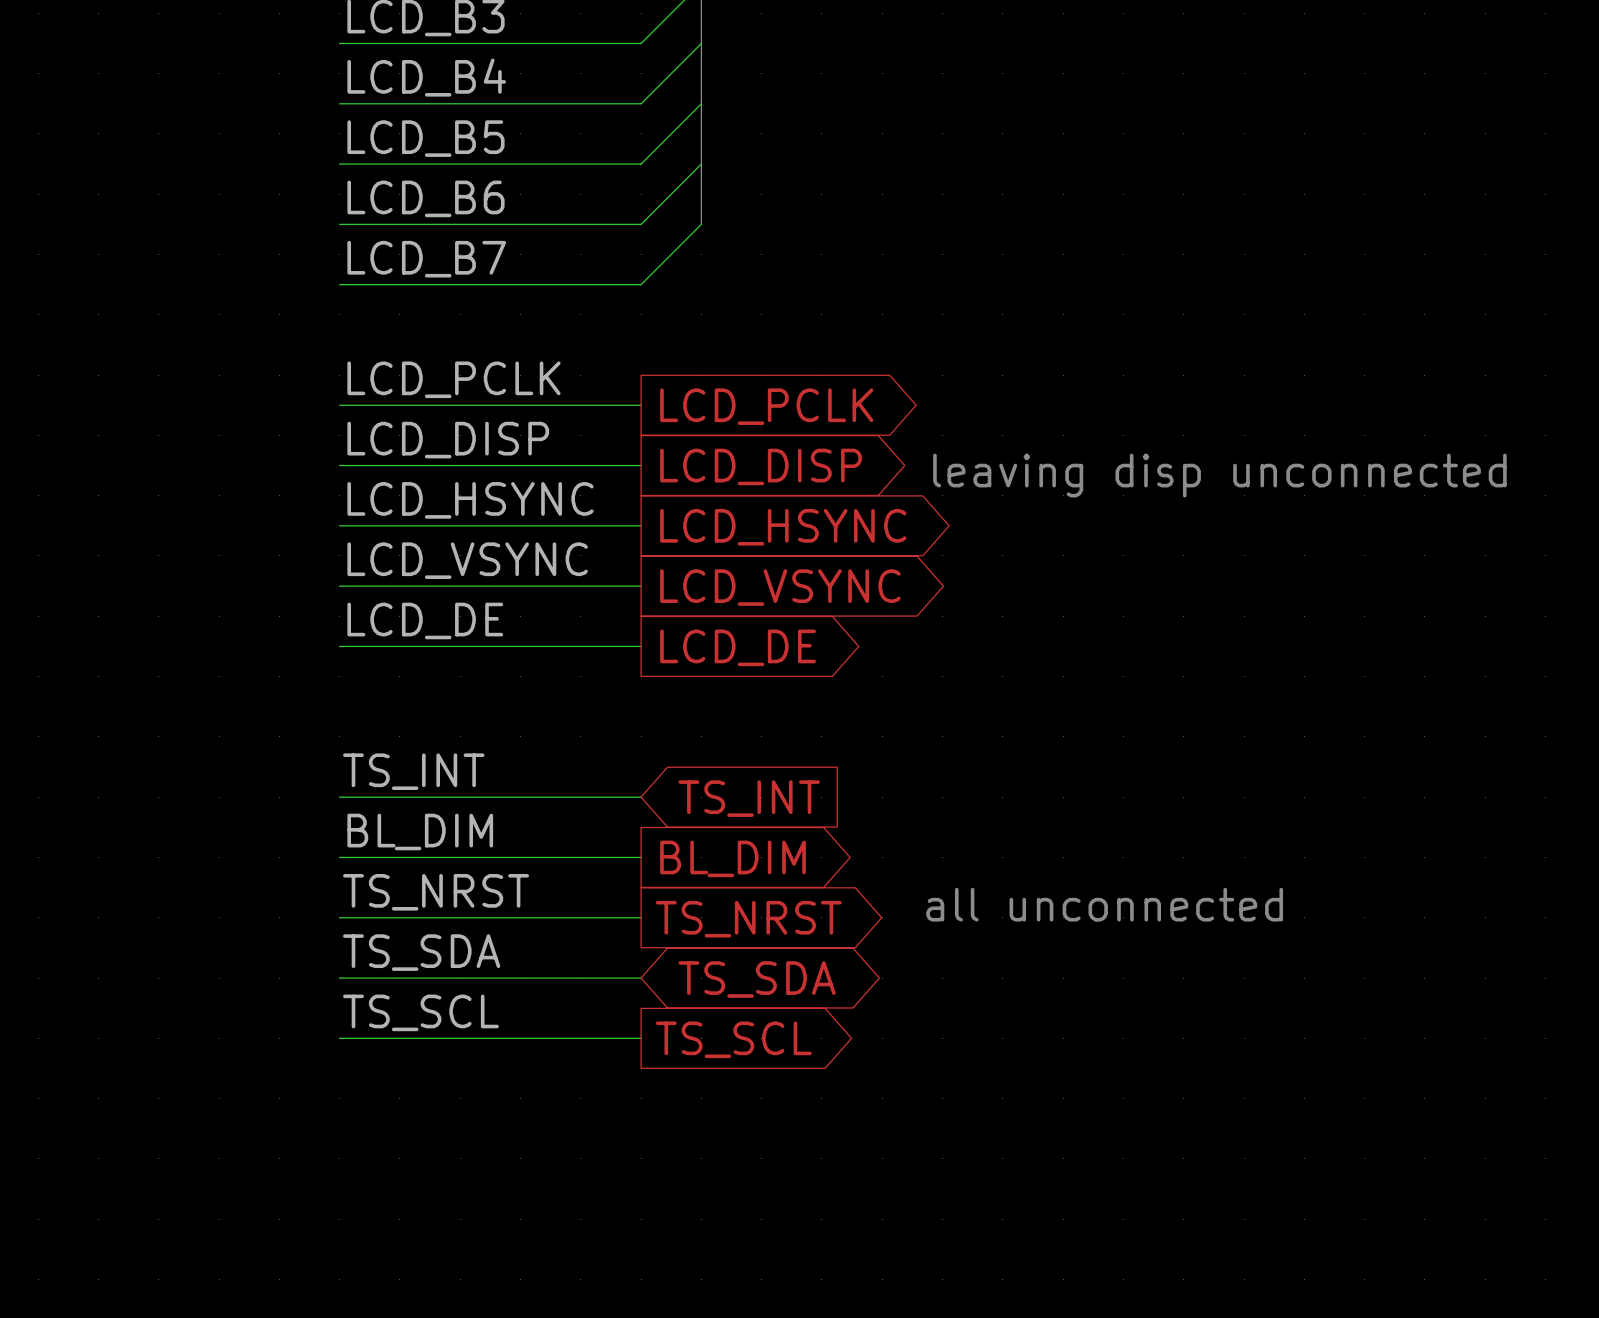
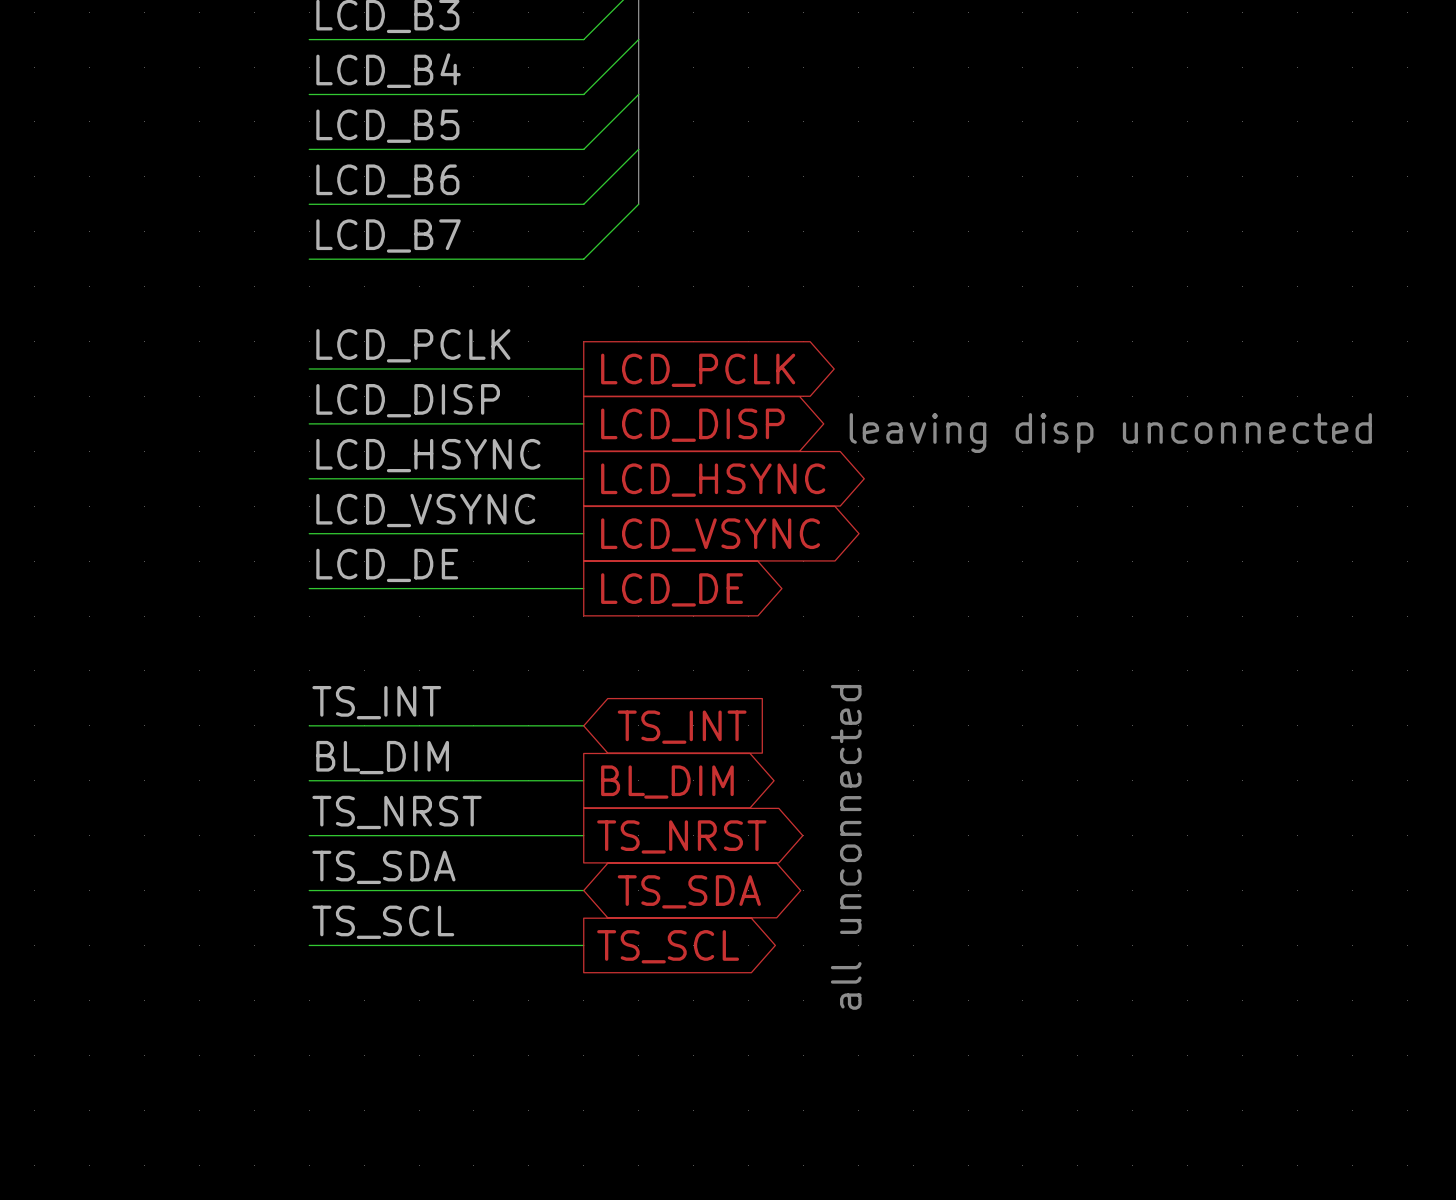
text rotation: 0° (1104, 904) -> 90° counterclockwise (846, 847)

